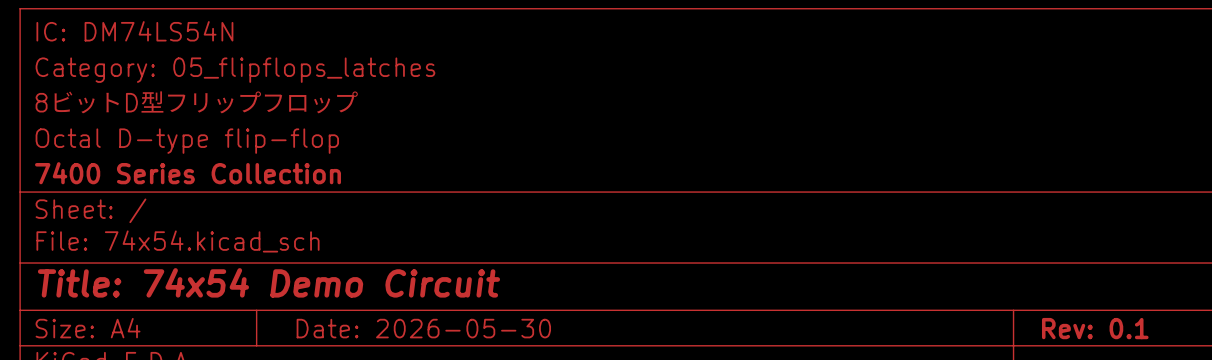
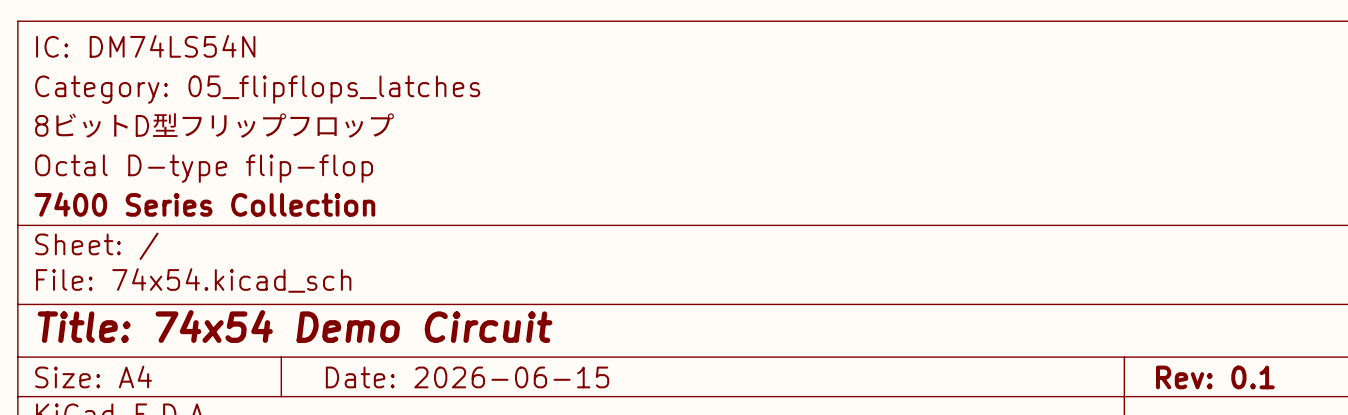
title block: Date: 2026-05-30 (423, 328) -> Date: 2026-06-15 (467, 377)

